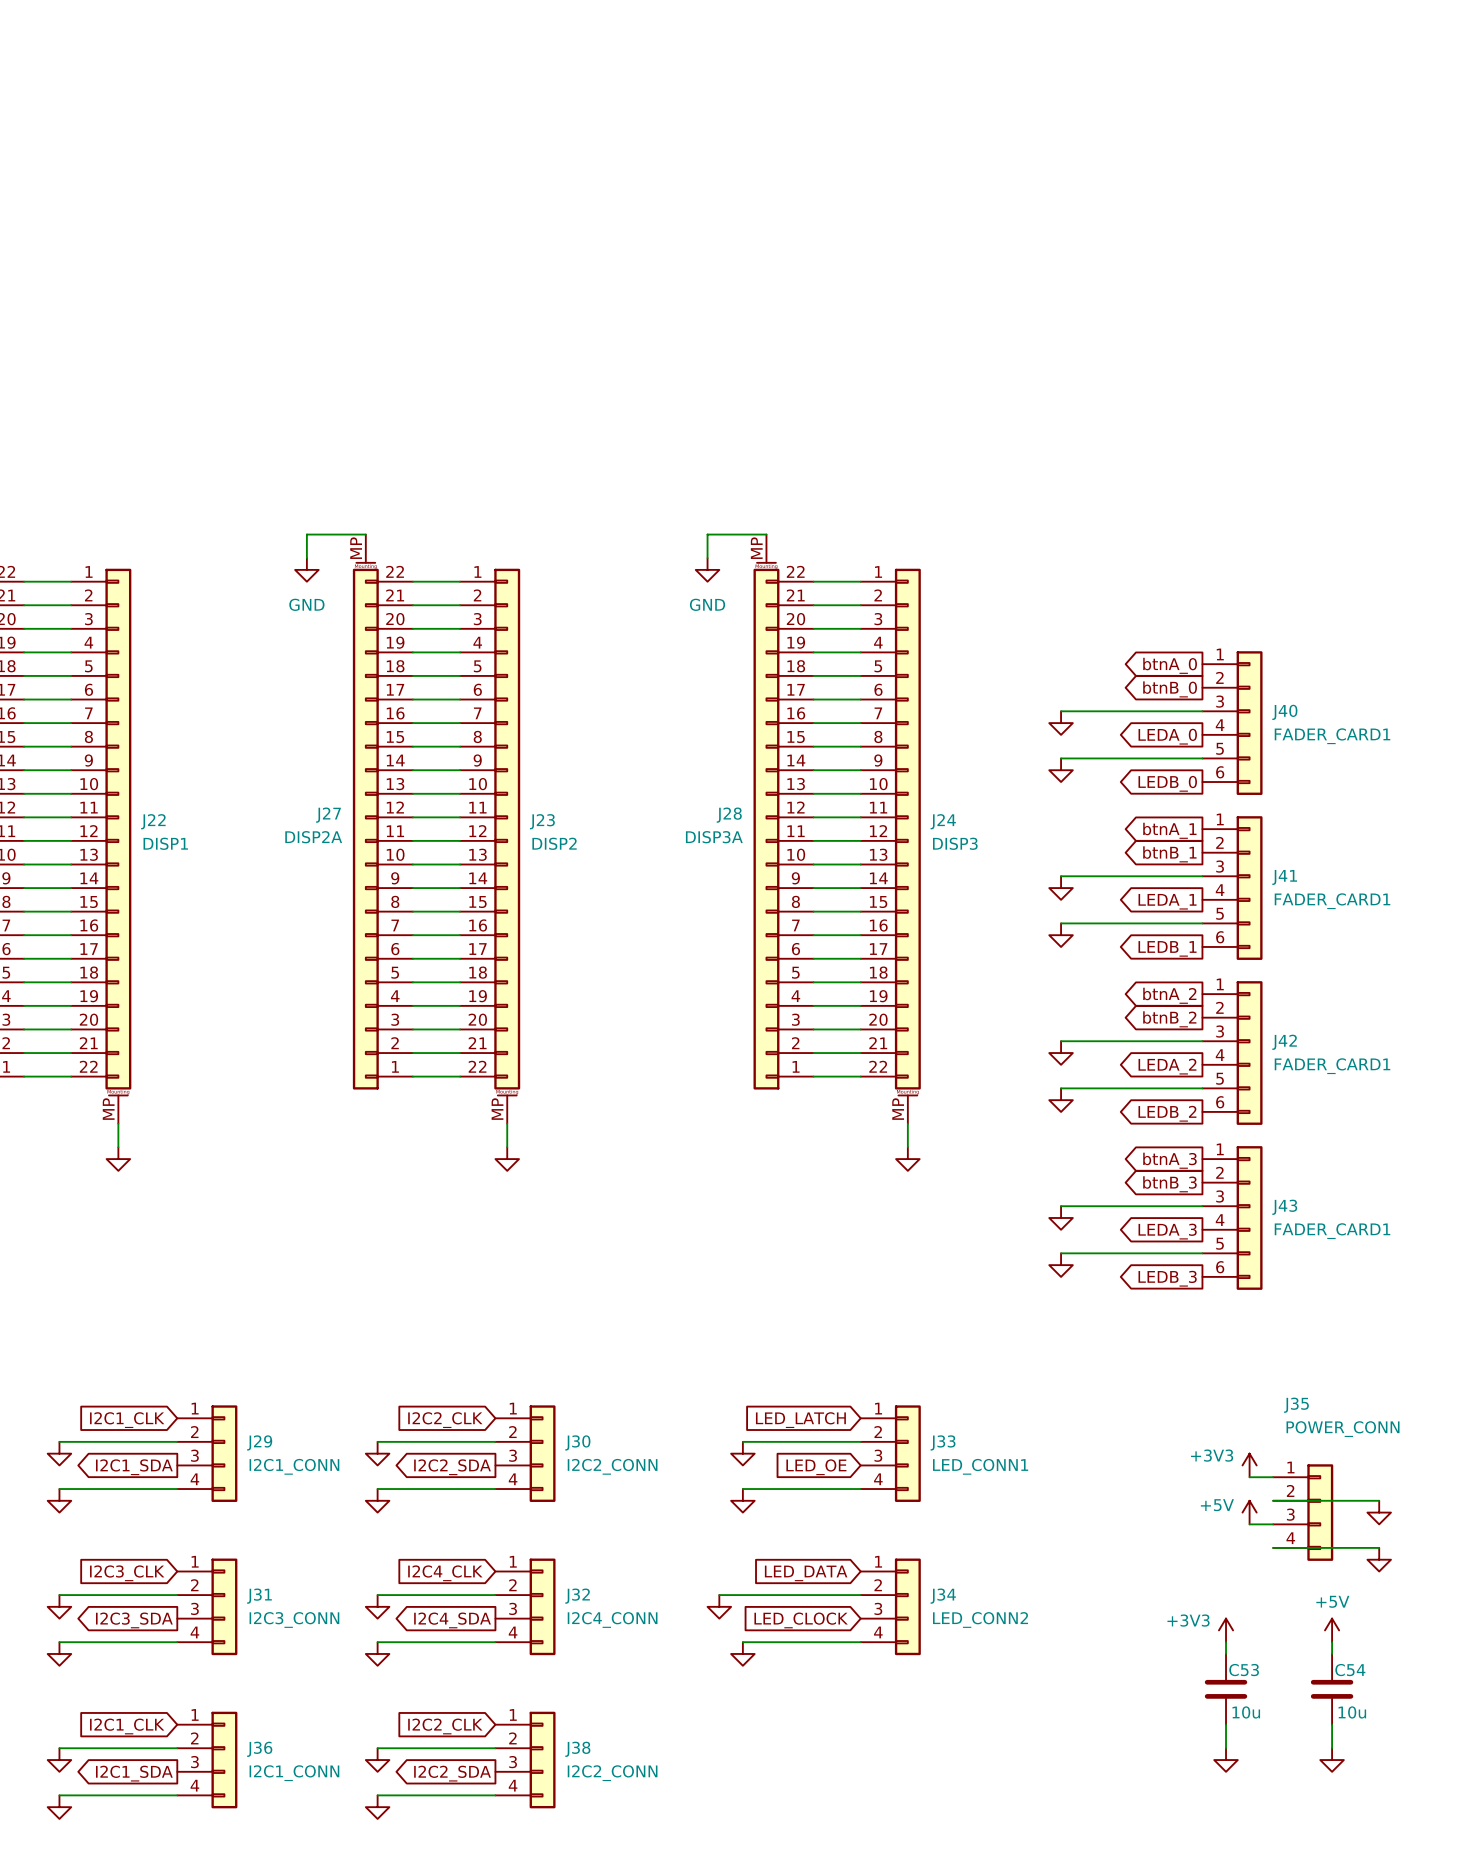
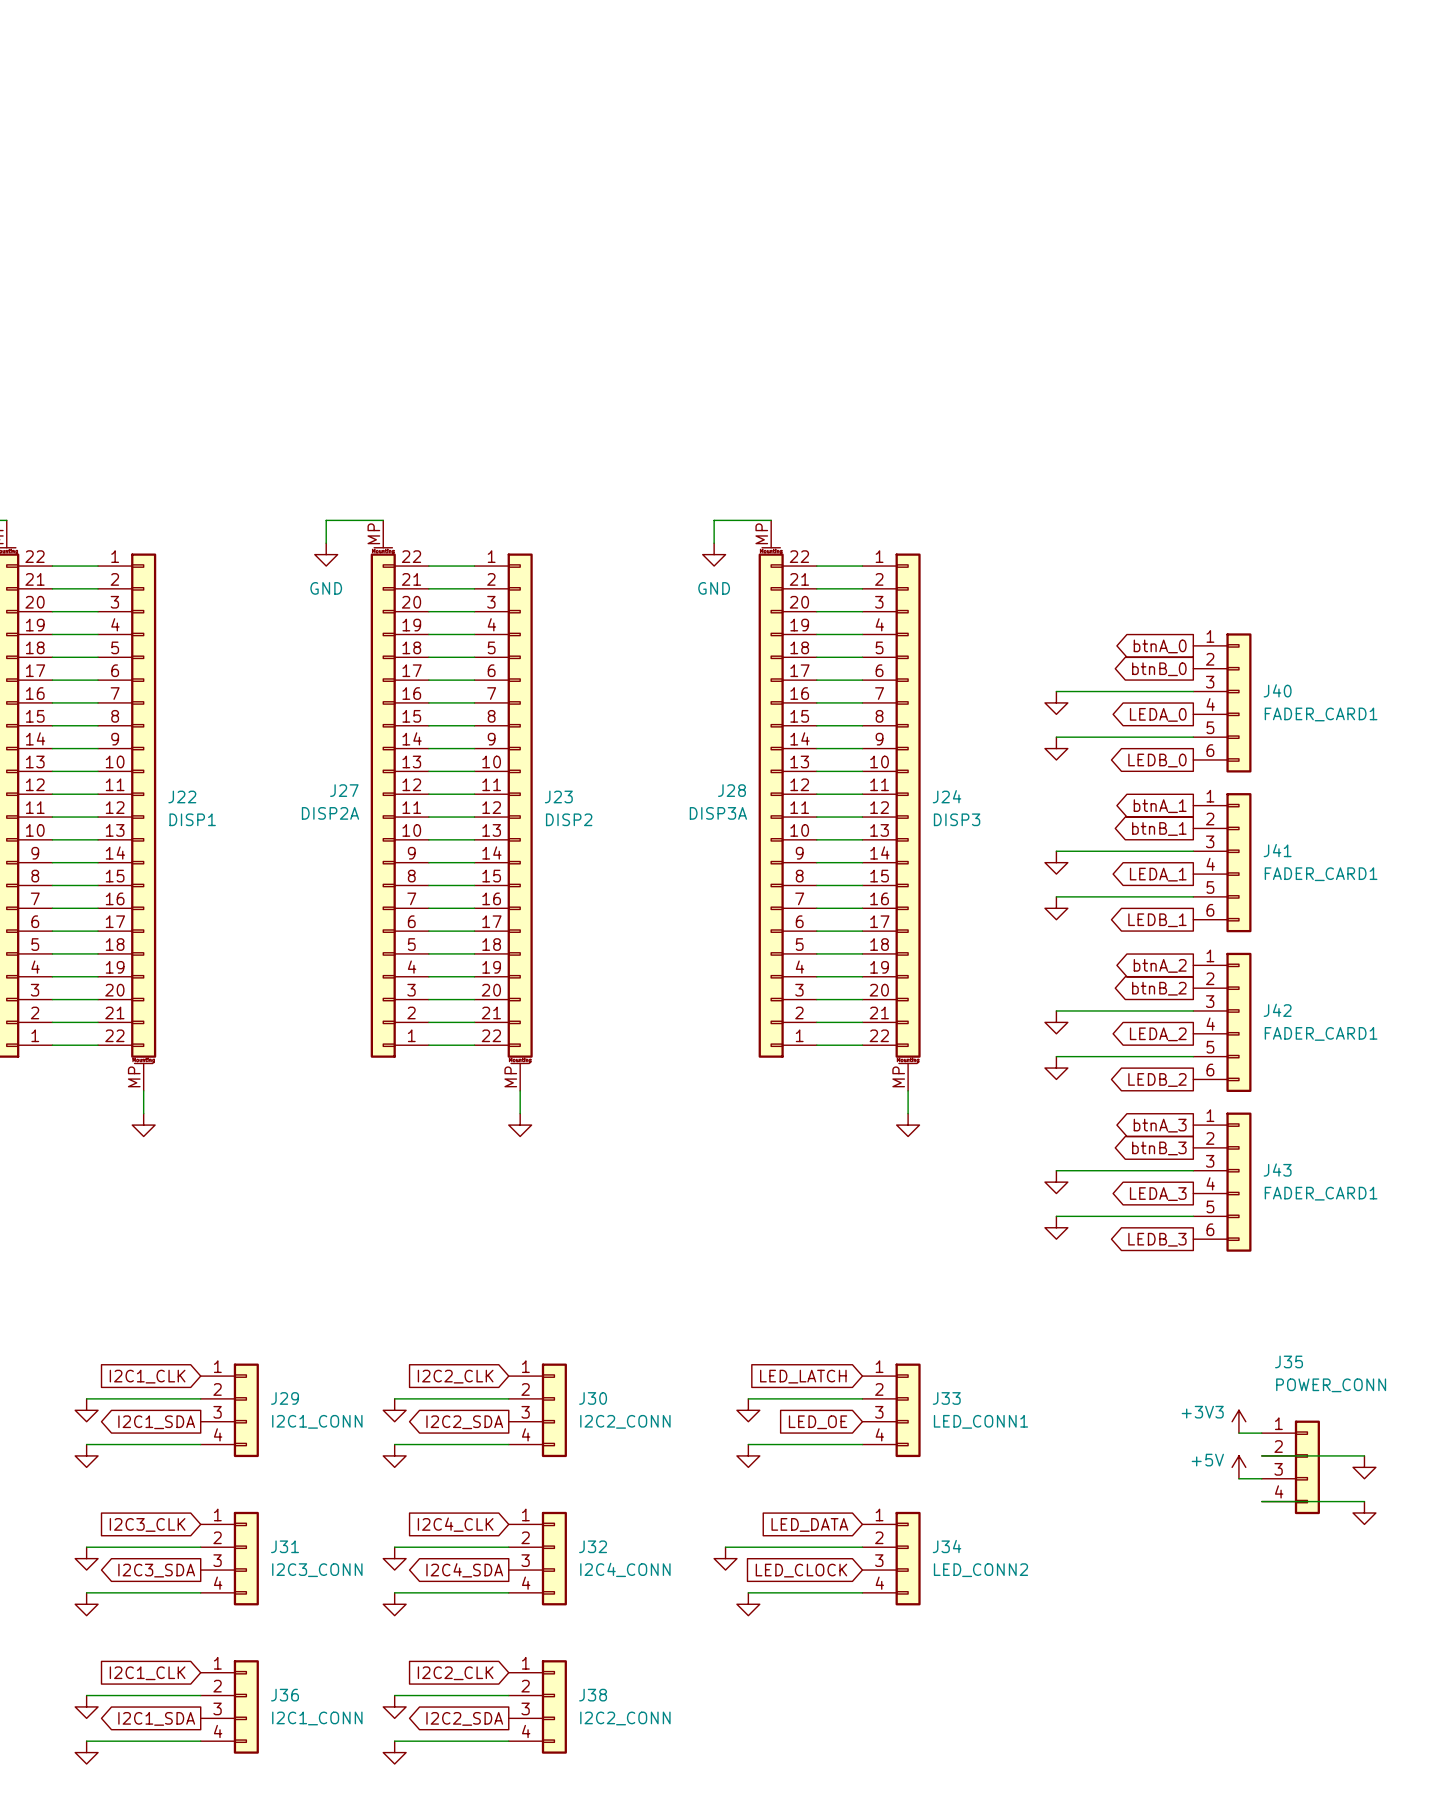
power symbol: +3V3 (1226, 1630) -> none
power symbol: +5V (1332, 1630) -> none
wire: (1226, 1642) (1226, 1653) -> none
wire: (1332, 1642) (1332, 1653) -> none
C53: 10u (1226, 1689) -> none
C54: 10u (1332, 1689) -> none
wire: (1226, 1724) (1226, 1748) -> none
wire: (1332, 1724) (1332, 1748) -> none
power symbol: (1226, 1760) -> none
power symbol: (1332, 1760) -> none

